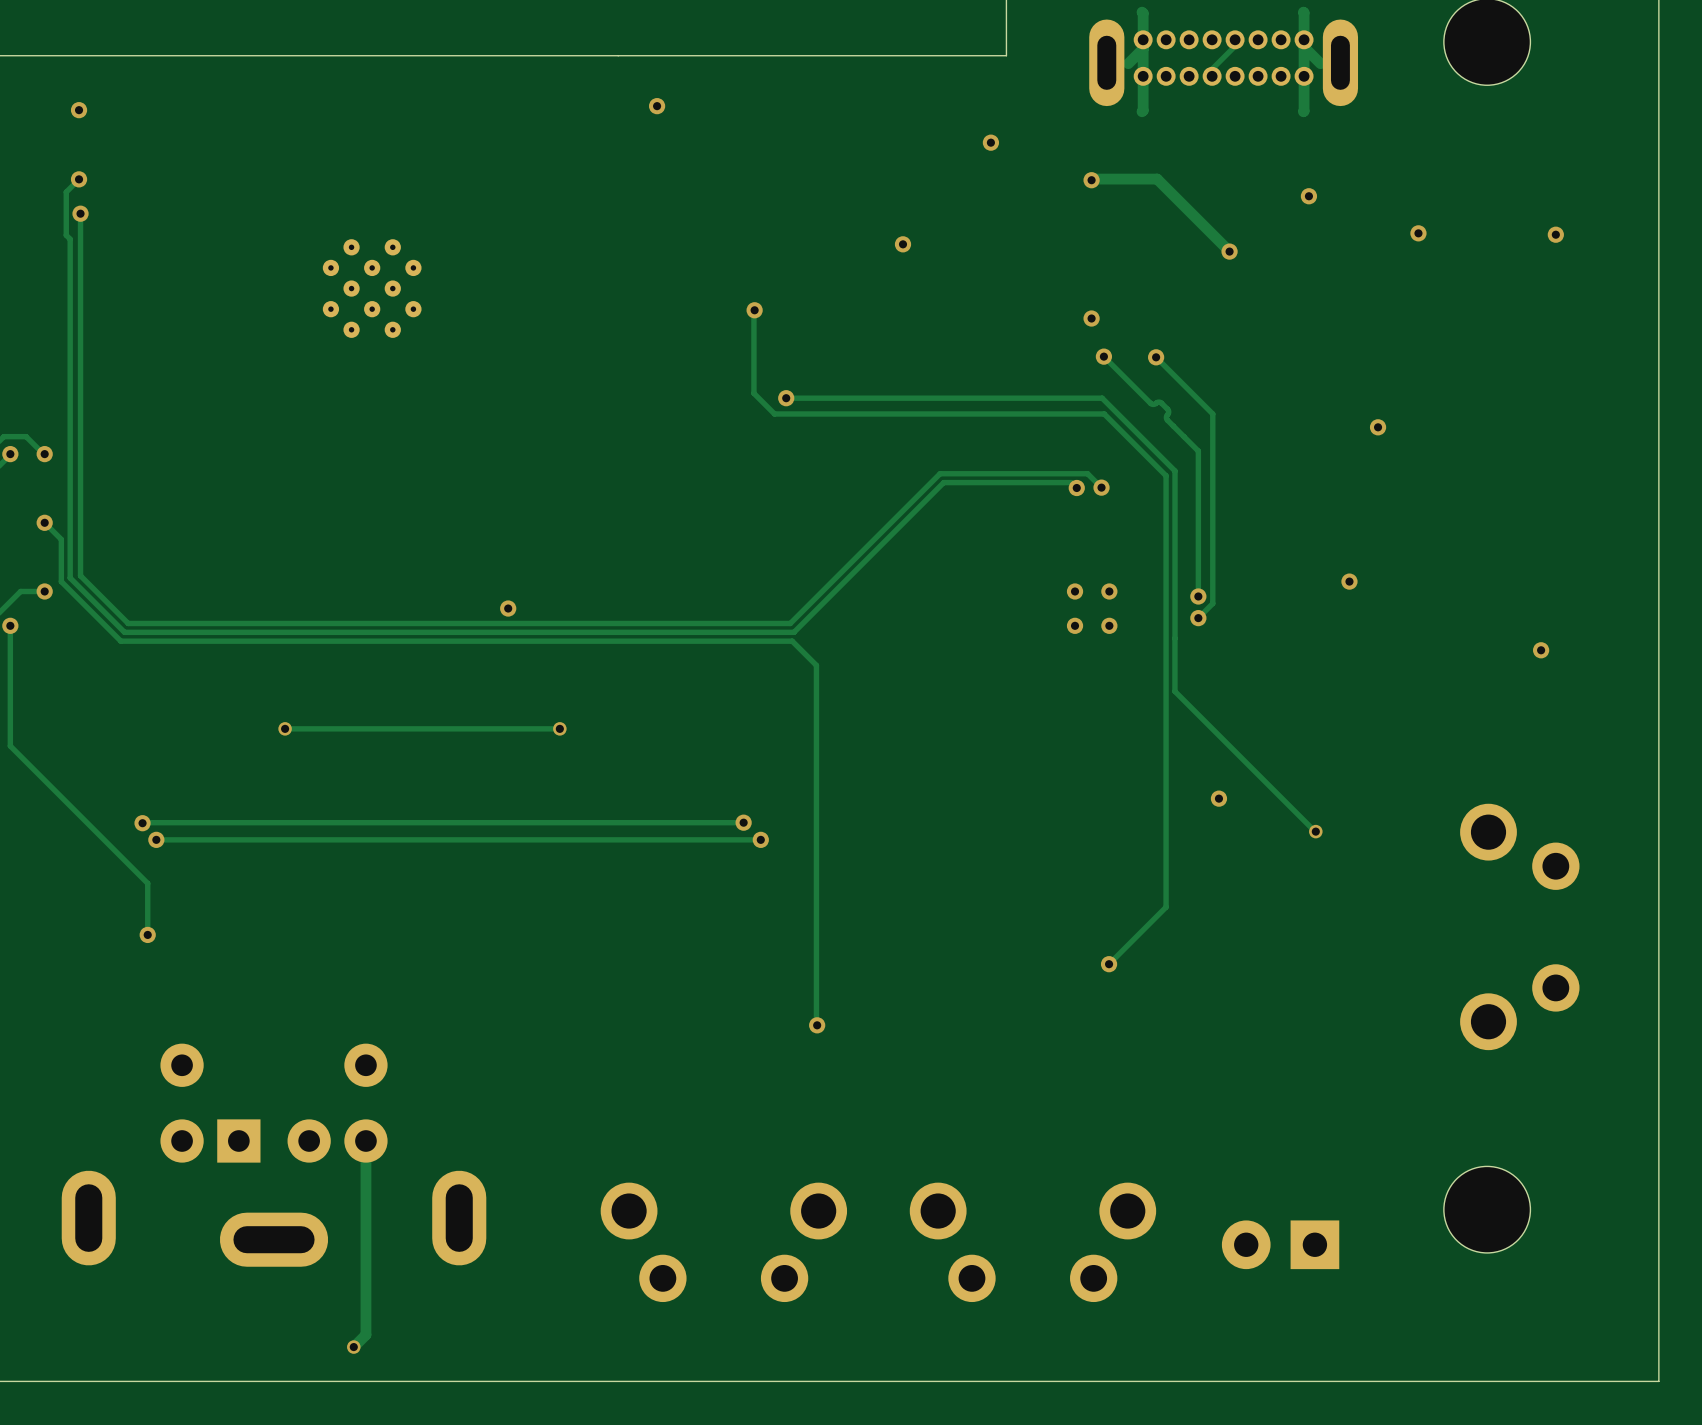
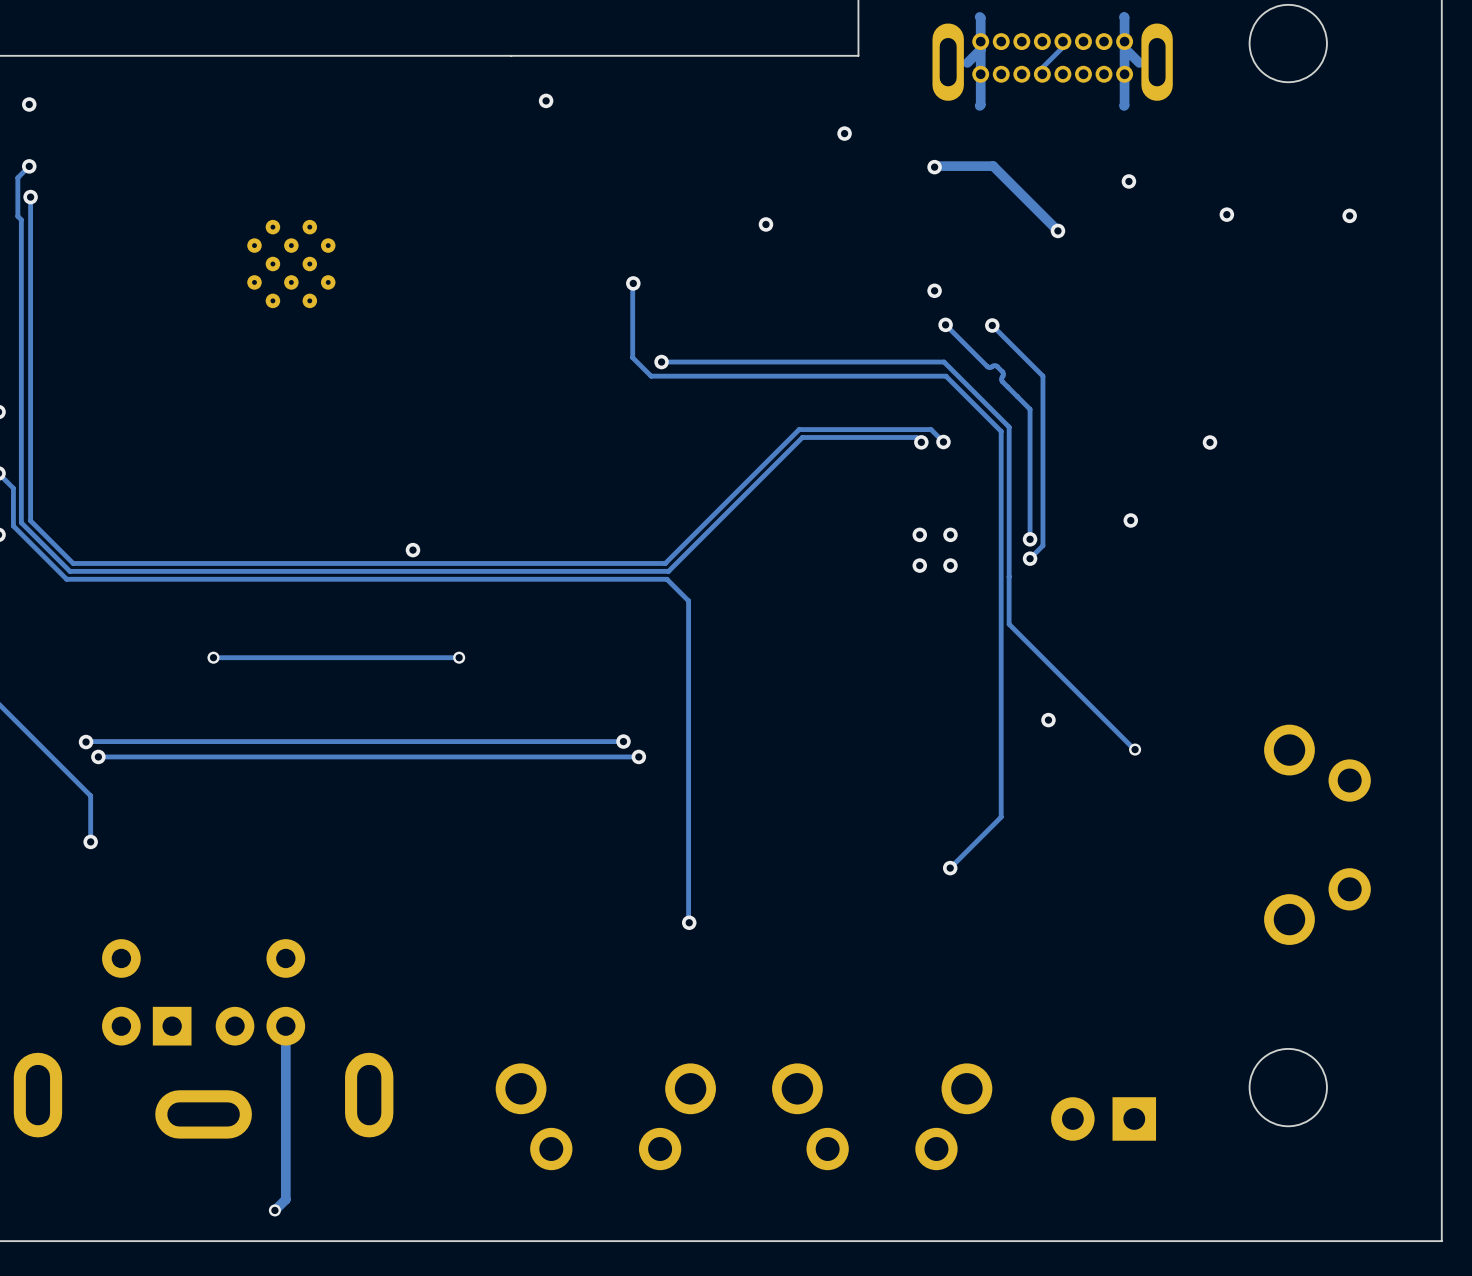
via: (1378, 427) -> none
via: none -> (1210, 442)
via position: (1349, 581) -> (1130, 520)
via: (1541, 650) -> none

